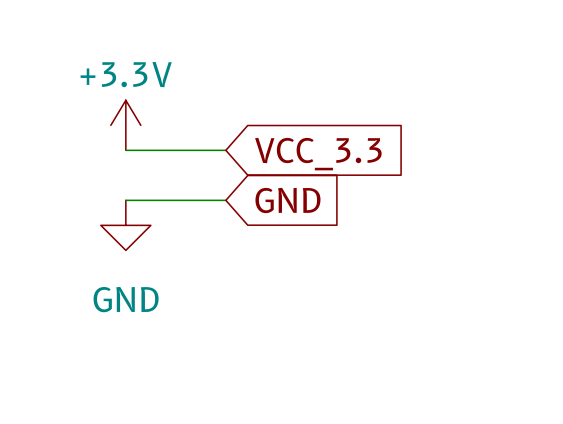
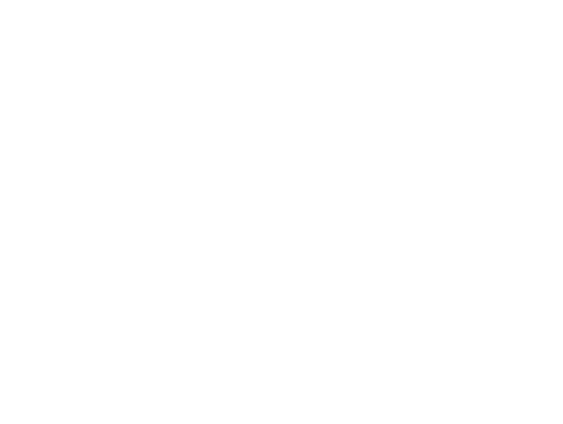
power symbol: +3.3V (125, 125) -> none
wire: (125, 150) (225, 150) -> none
global label: VCC_3.3 (318, 154) -> none
wire: (125, 200) (225, 200) -> none
global label: GND (287, 200) -> none
power symbol: GND (125, 225) -> none

